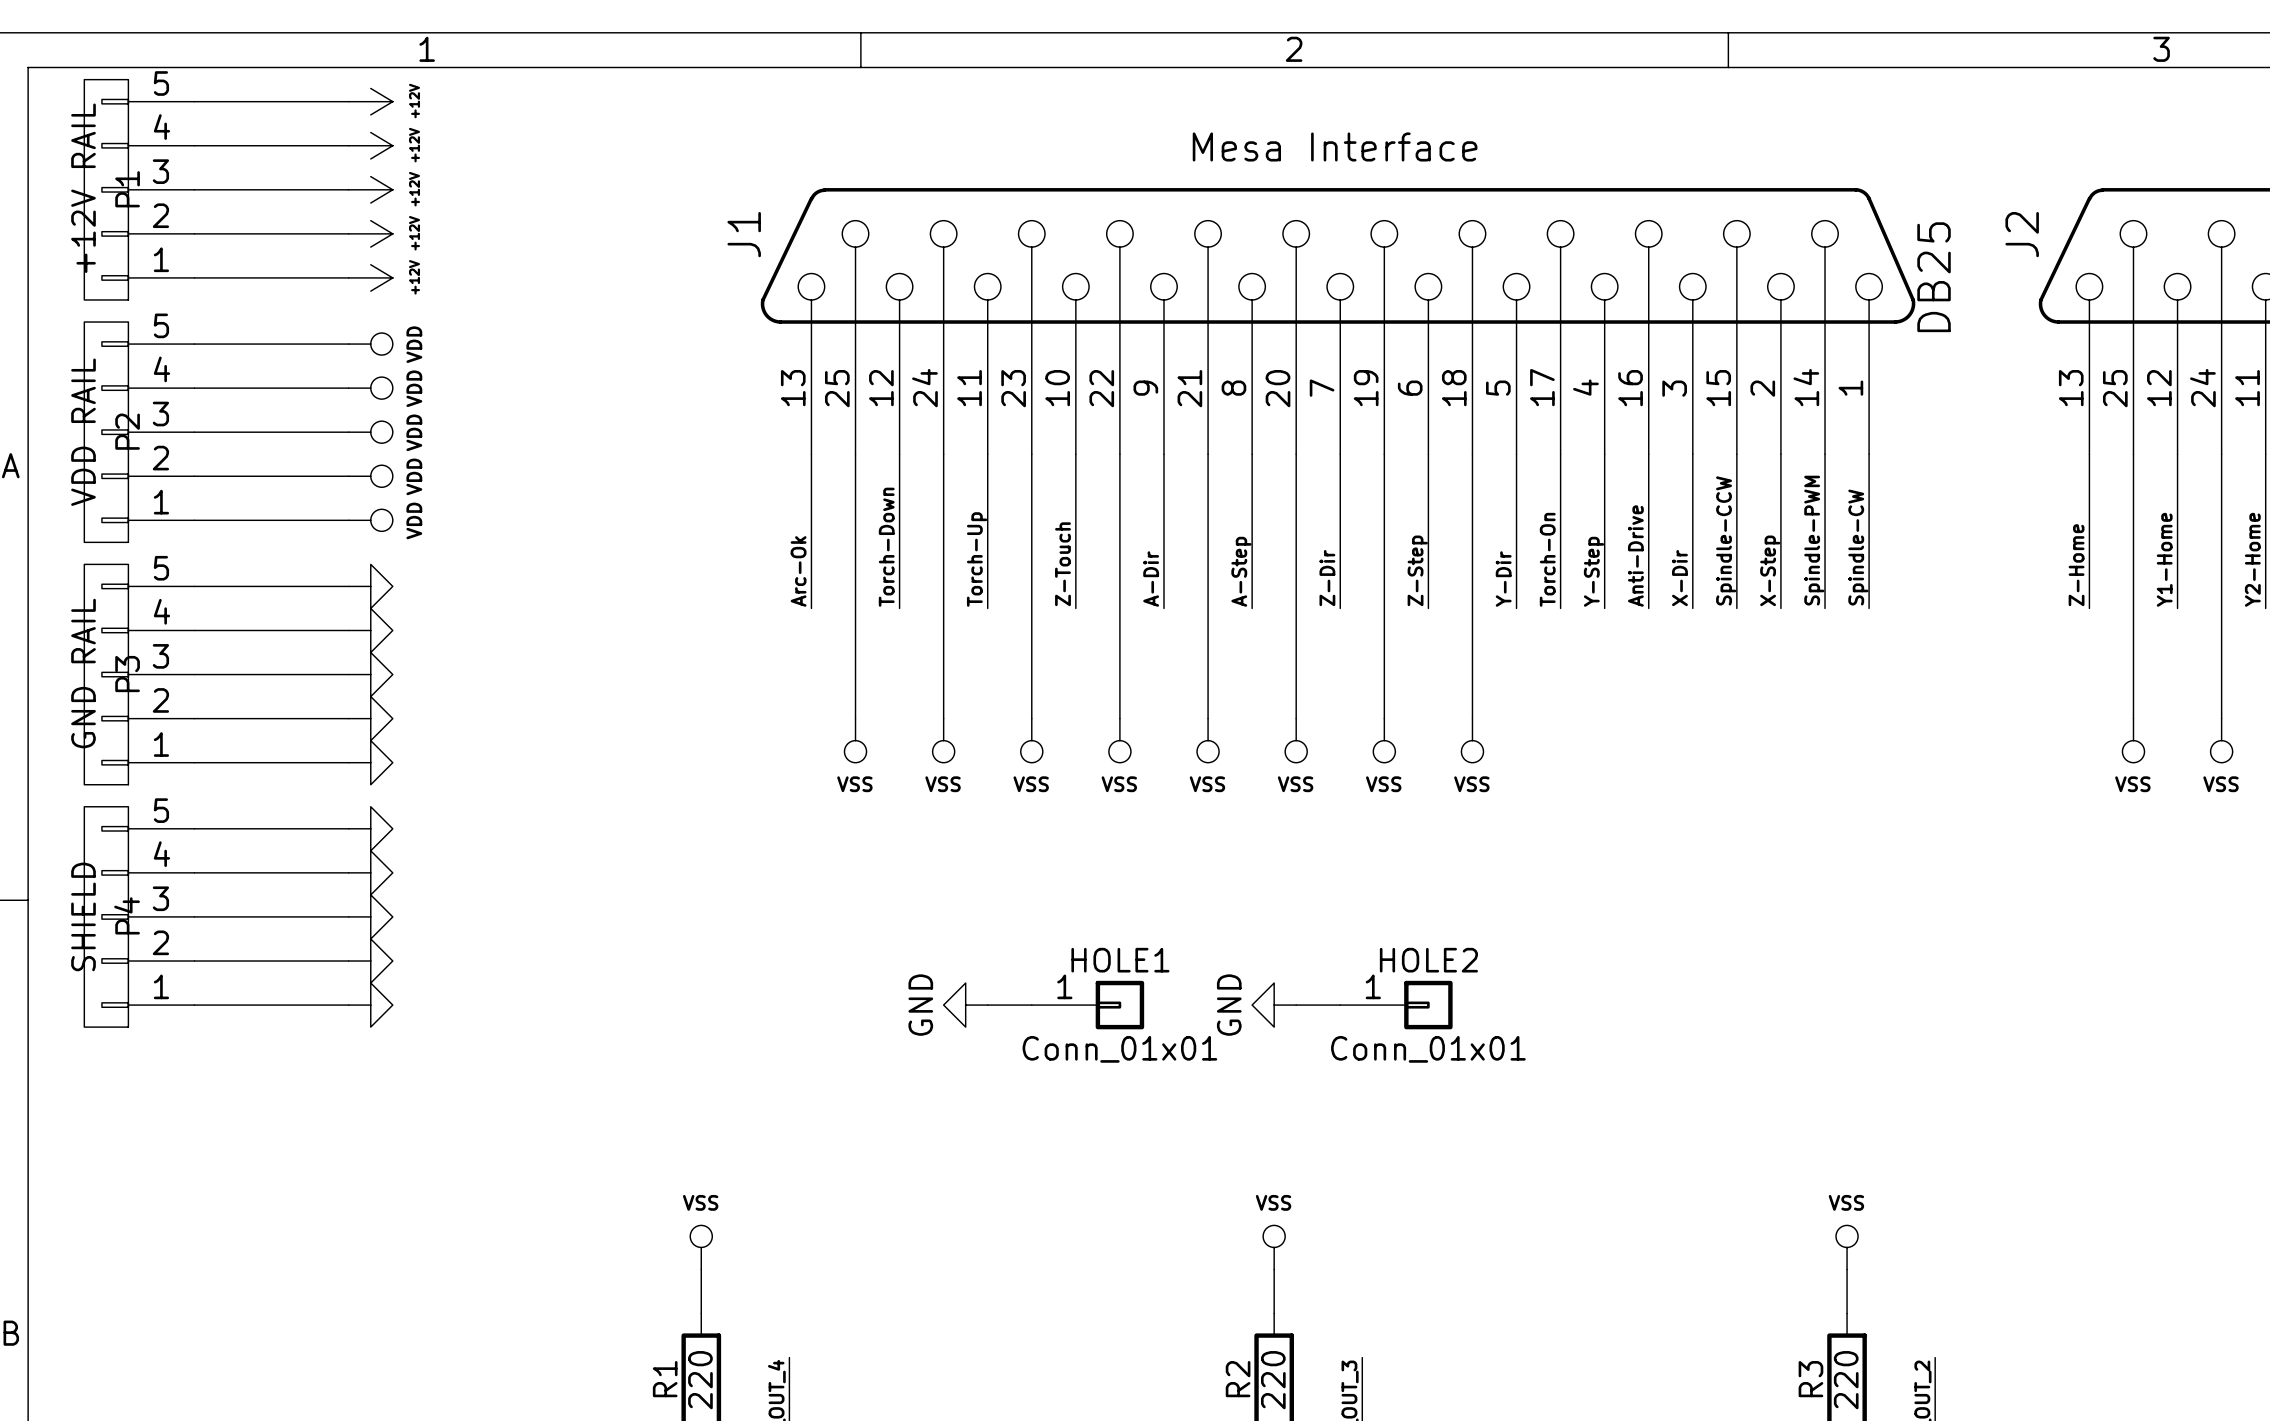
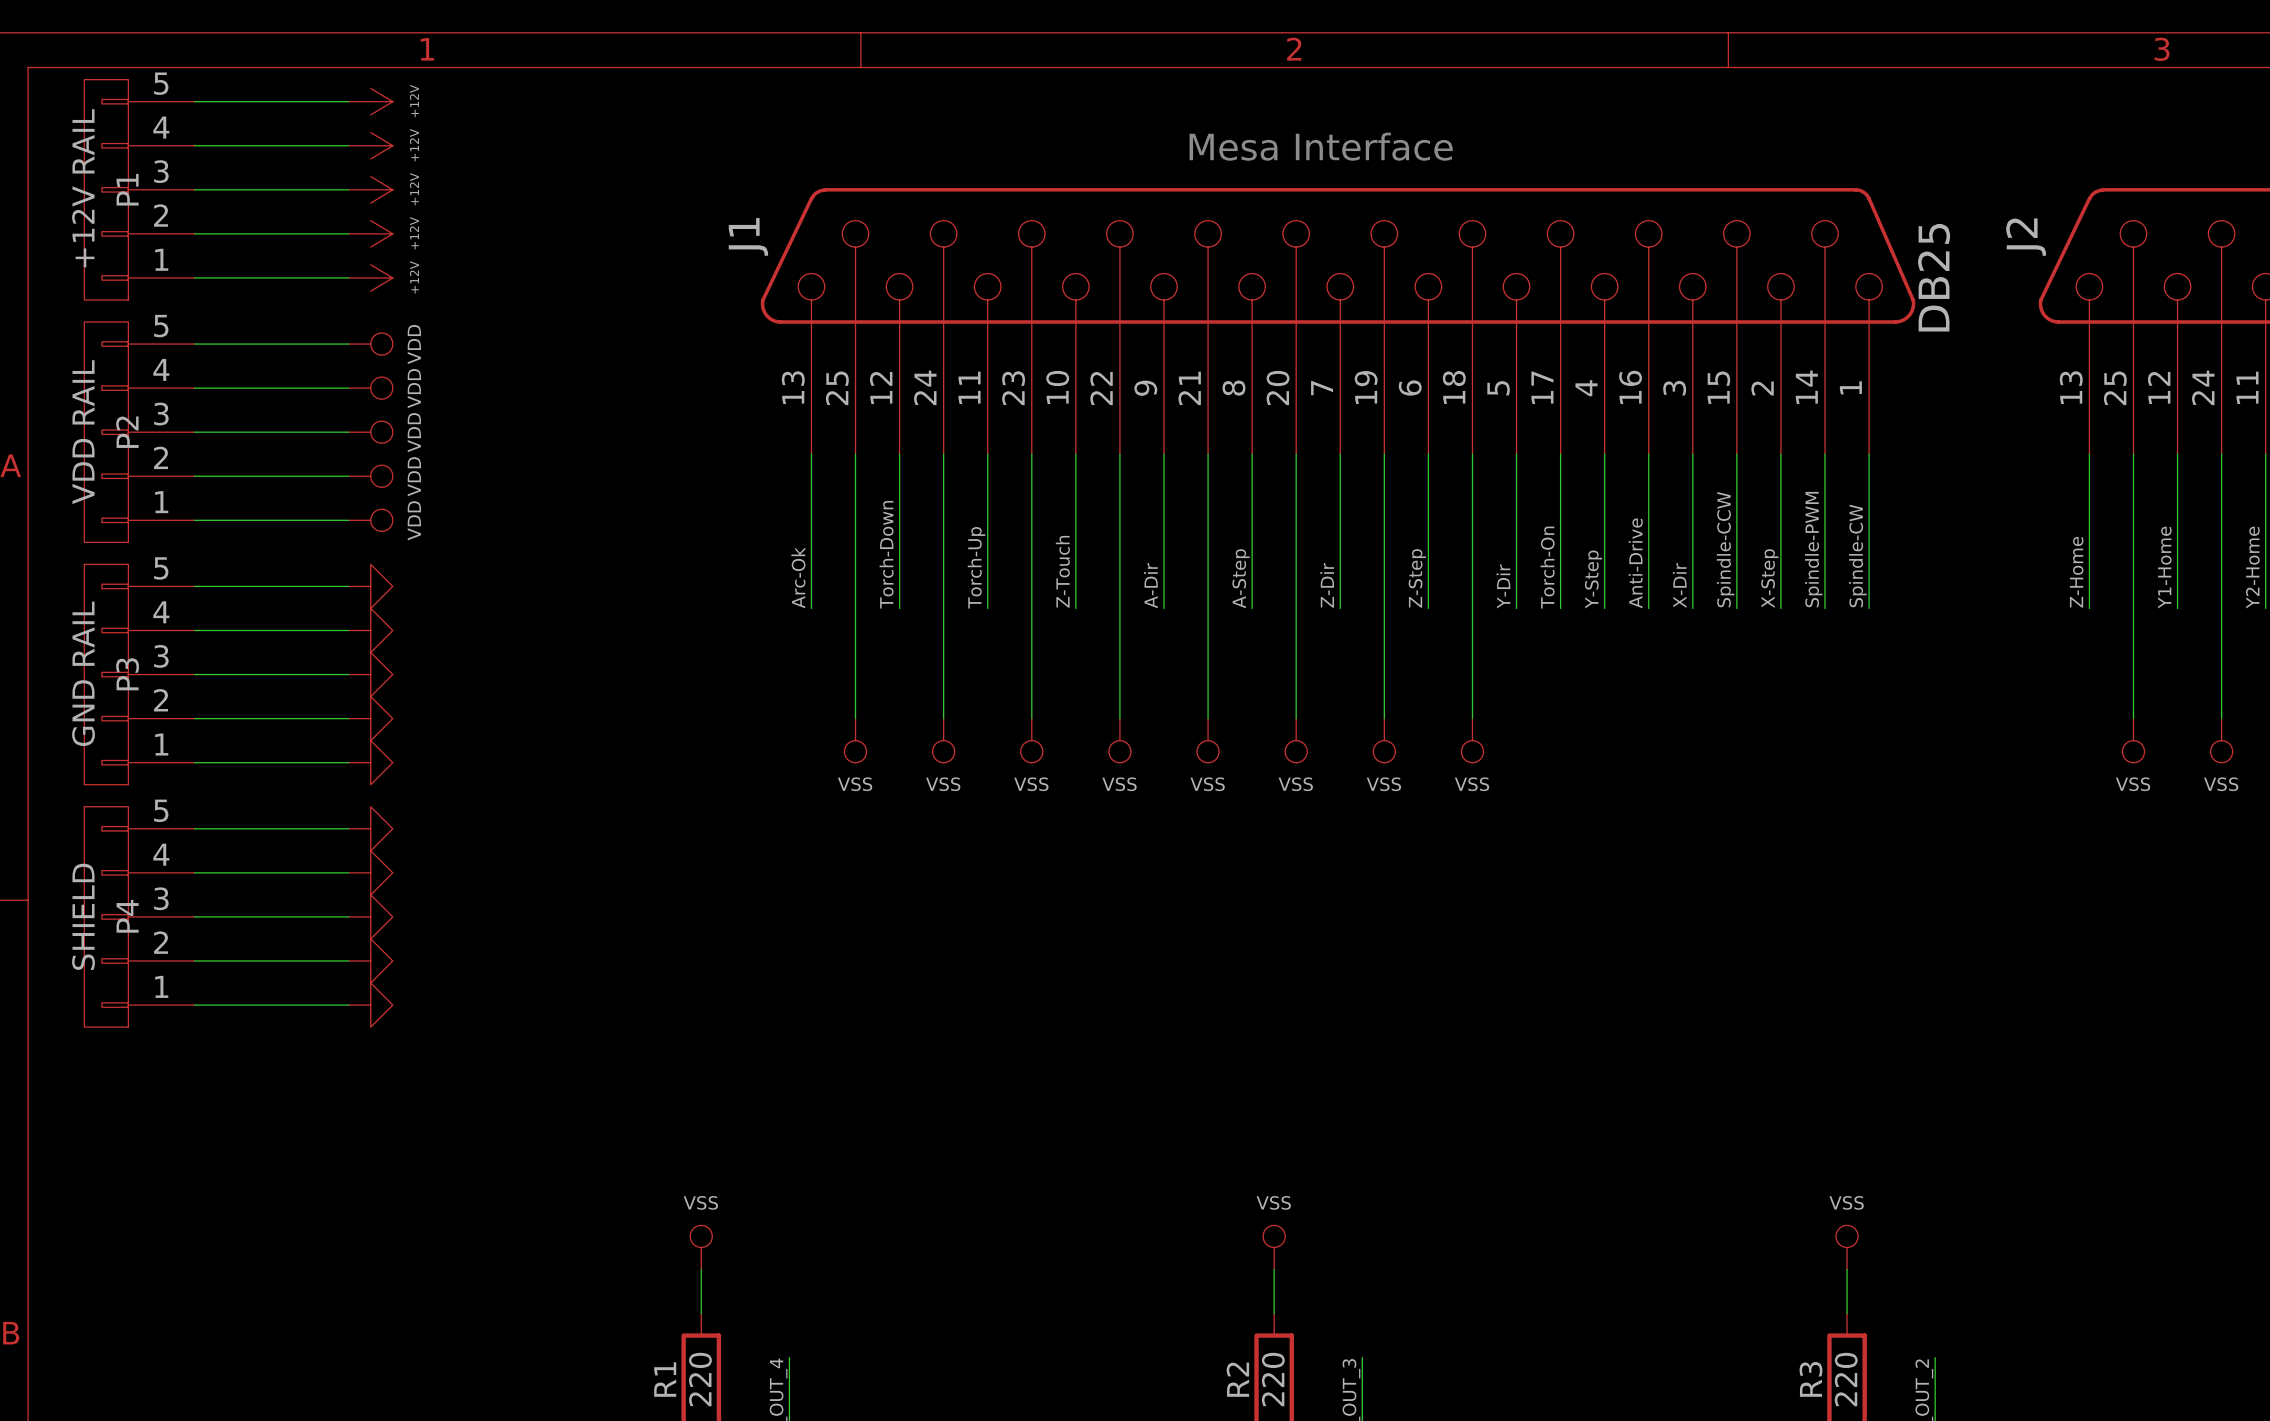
power symbol: GND (965, 1005) -> none
wire: (987, 1005) (1031, 1005) -> none
HOLE1: Conn_01x01 (1087, 1005) -> none
power symbol: GND (1274, 1005) -> none
wire: (1296, 1005) (1340, 1005) -> none
HOLE2: Conn_01x01 (1396, 1005) -> none

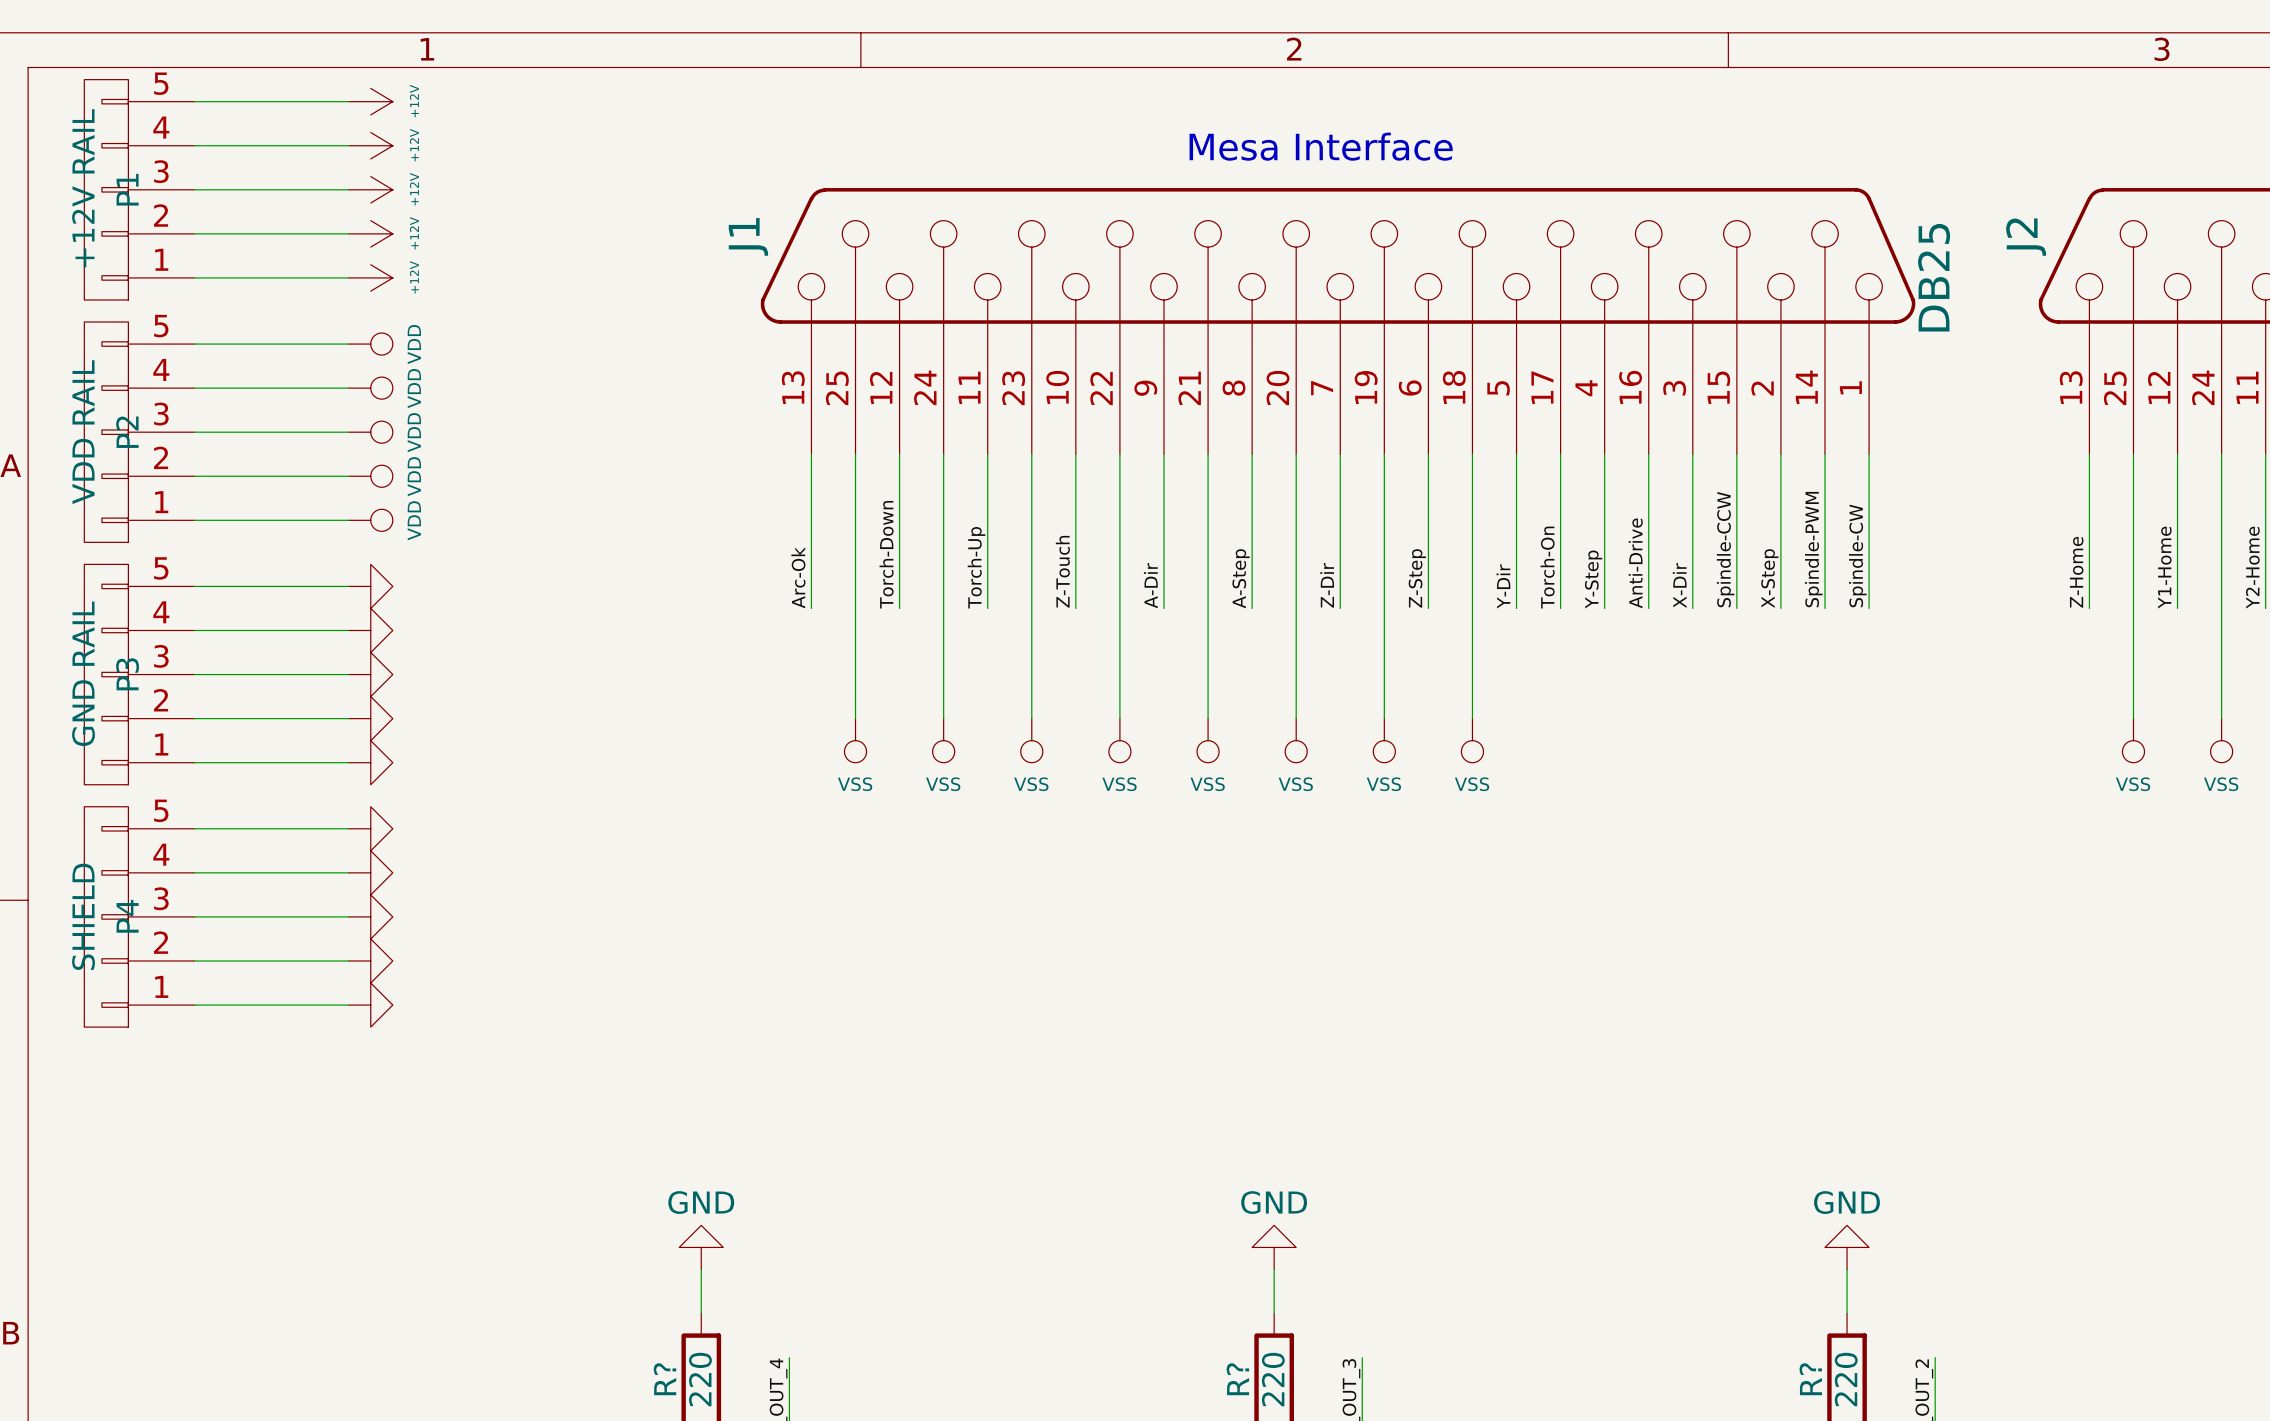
power symbol: VSS (701, 1247) -> GND (701, 1247)
power symbol: VSS (1274, 1247) -> GND (1274, 1247)
power symbol: VSS (1847, 1247) -> GND (1847, 1247)
R1 name: R1 (665, 1379) -> R? (665, 1379)
R2 name: R2 (1237, 1379) -> R? (1237, 1379)
R3 name: R3 (1810, 1379) -> R? (1810, 1379)

